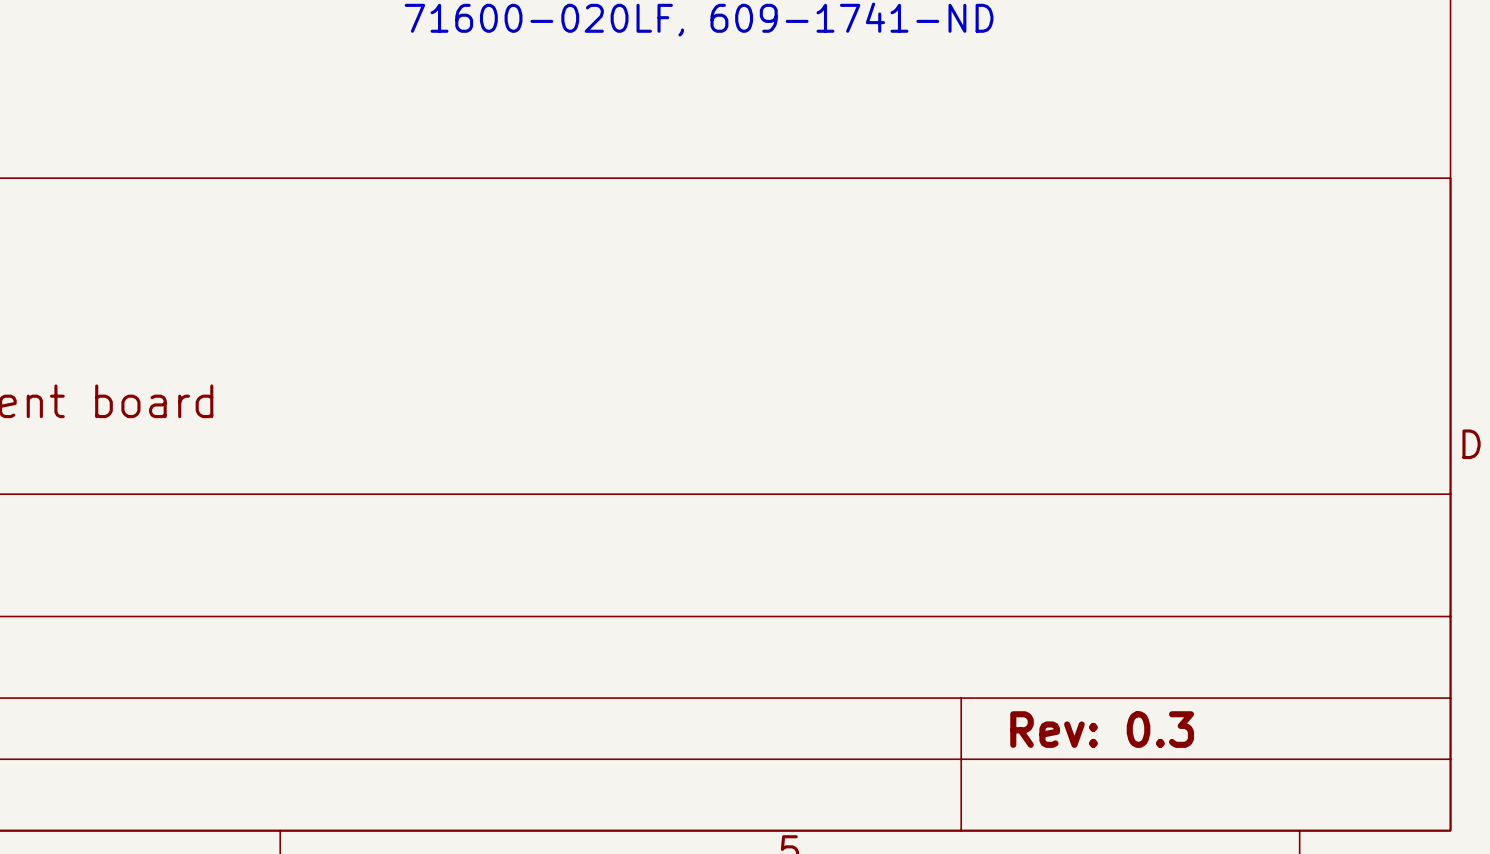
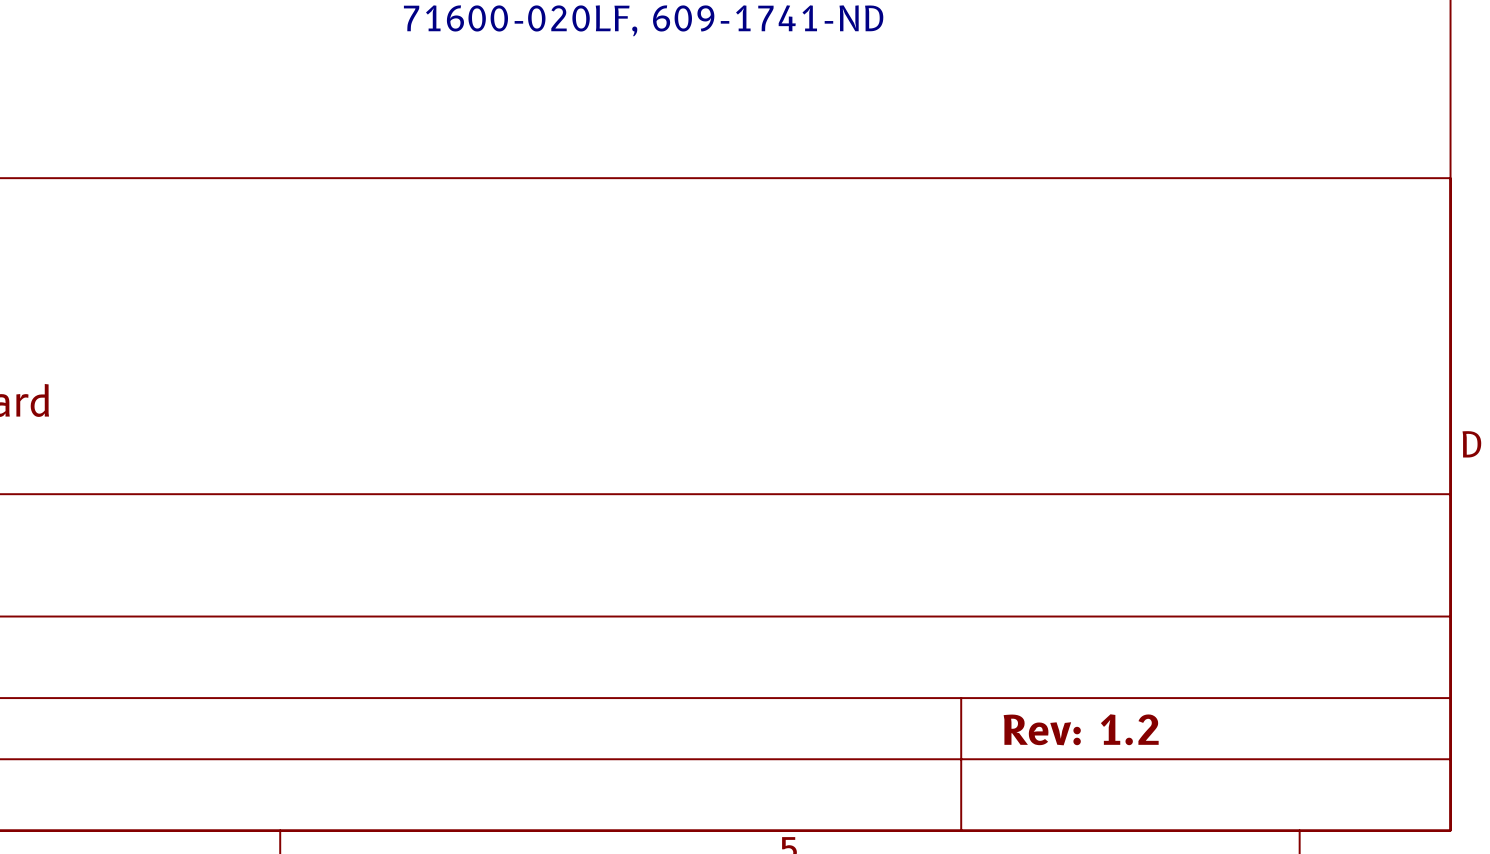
title block: Rev: 0.3 (1102, 729) -> Rev: 1.2 (1081, 729)

